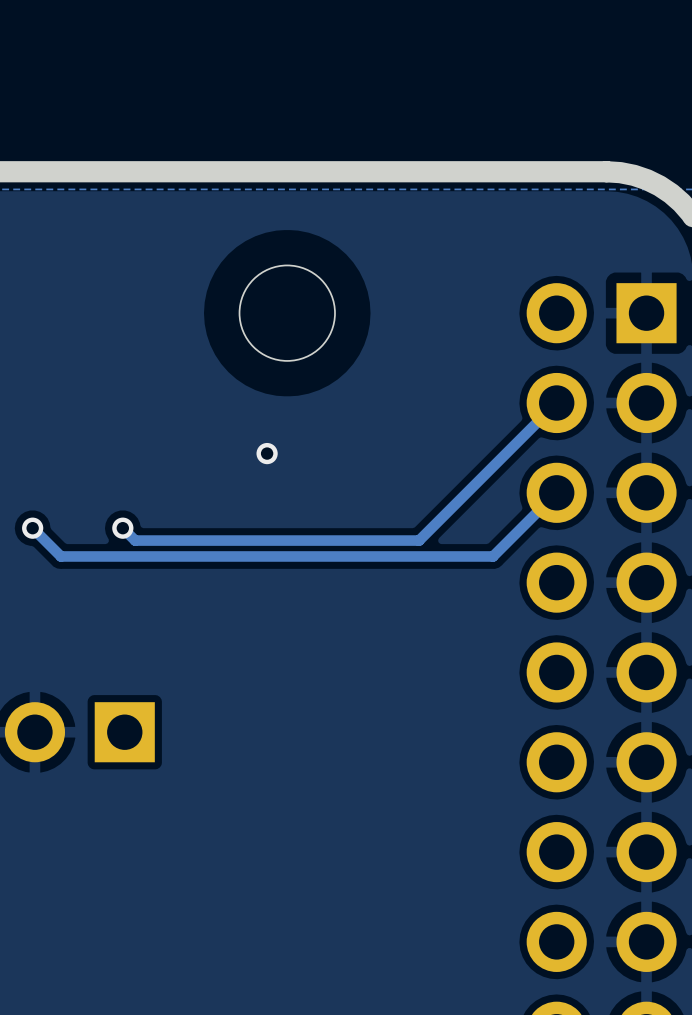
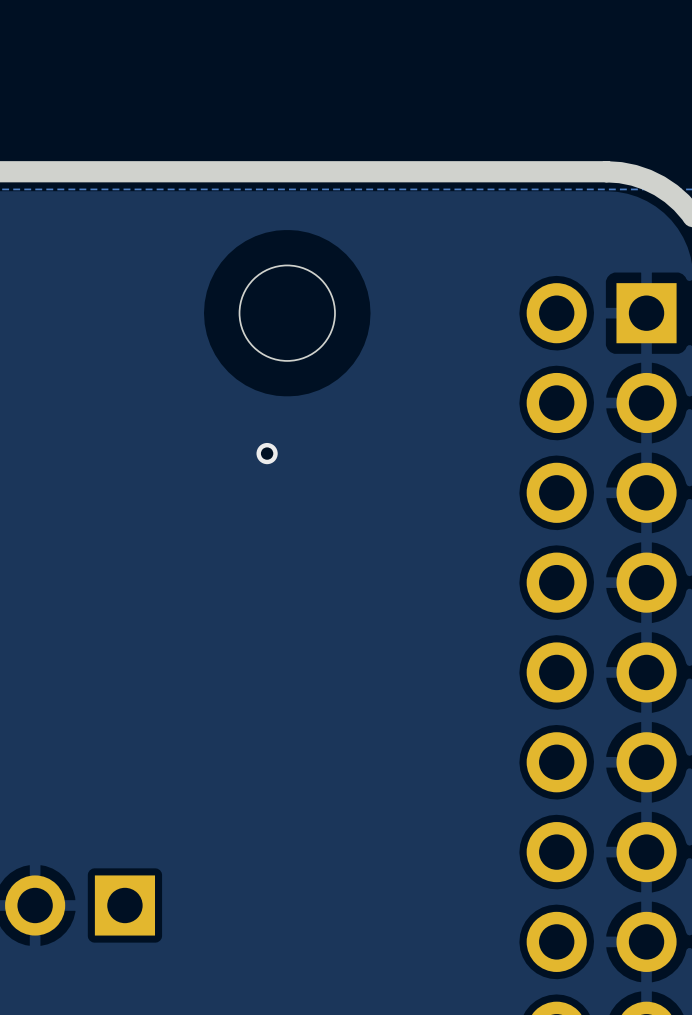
track: (556, 403) (419, 540) (135, 540) (122, 528) -> none
track: (556, 492) (493, 556) (60, 556) (32, 528) -> none
via: (32, 528) -> none
via: (122, 528) -> none
part position: (79, 732) -> (80, 905)

